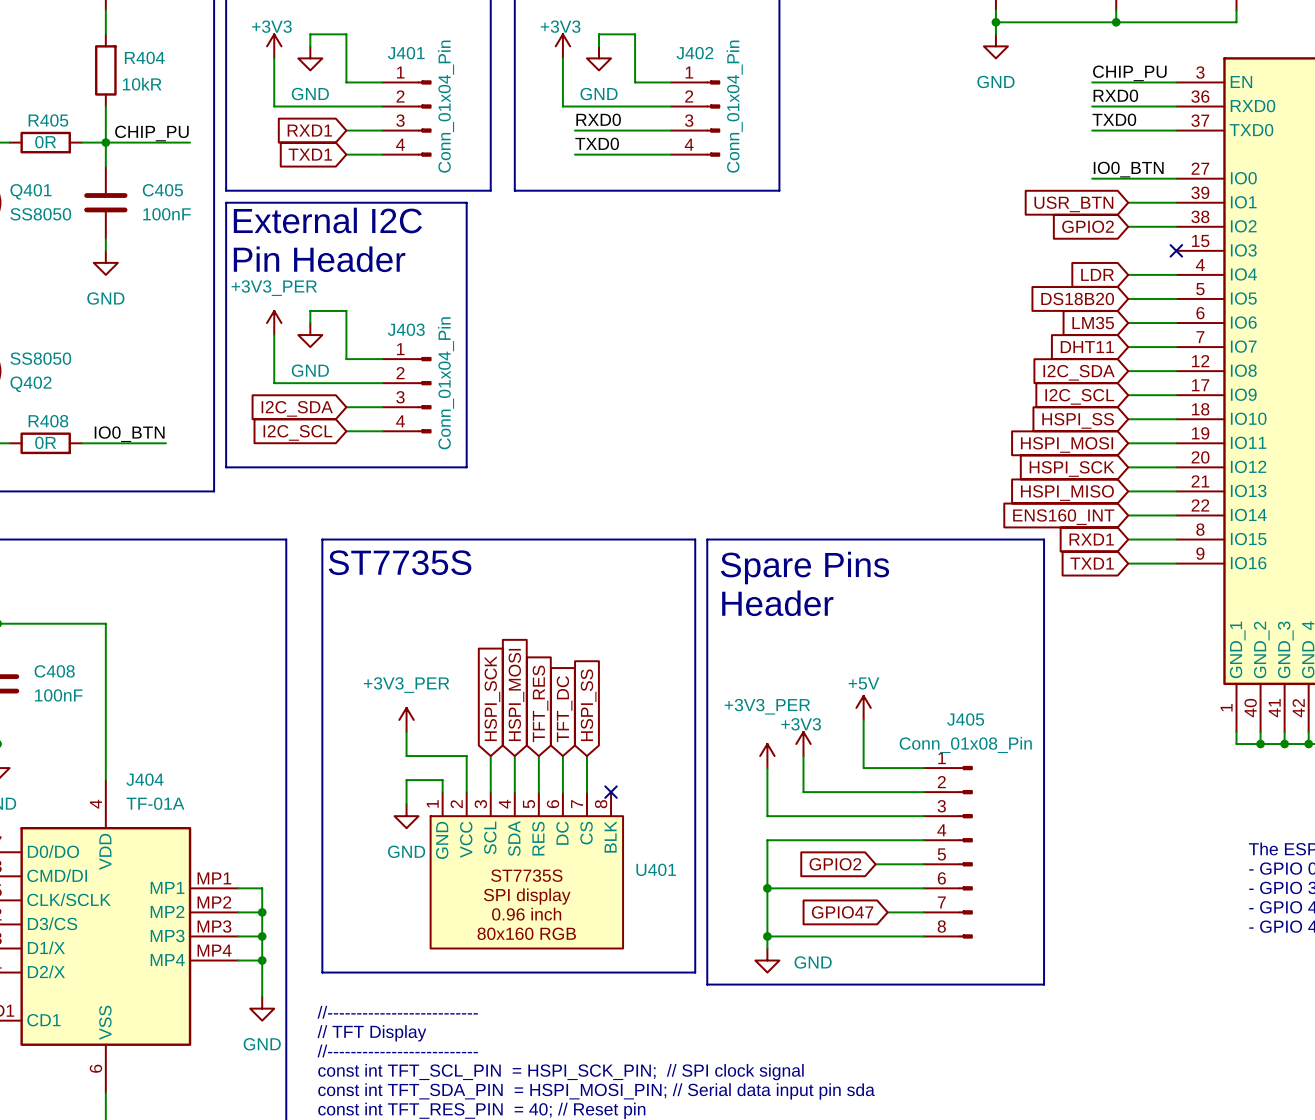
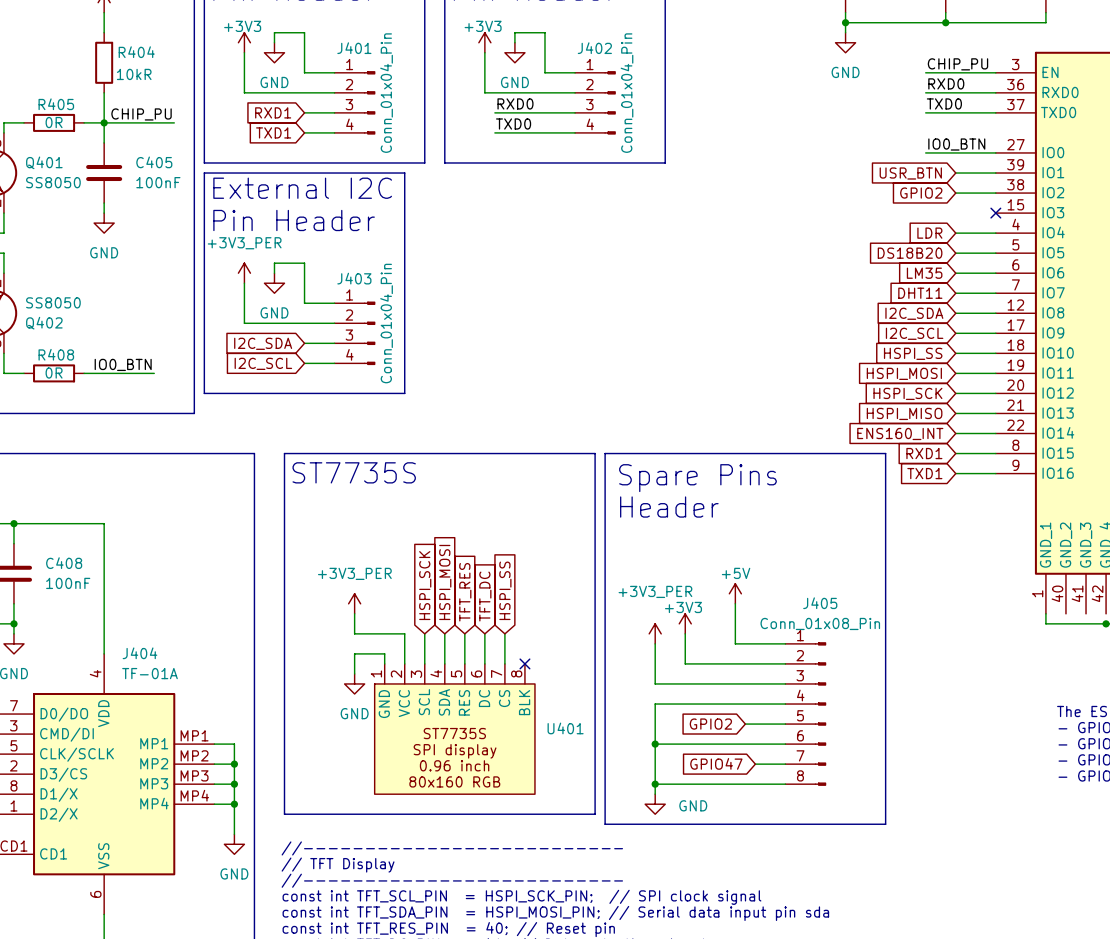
wire: (1260, 731) (1260, 744) -> none
wire: (1284, 731) (1284, 744) -> none
wire: (1308, 731) (1308, 744) -> none
junction: (1260, 744) -> none
junction: (1284, 744) -> none

